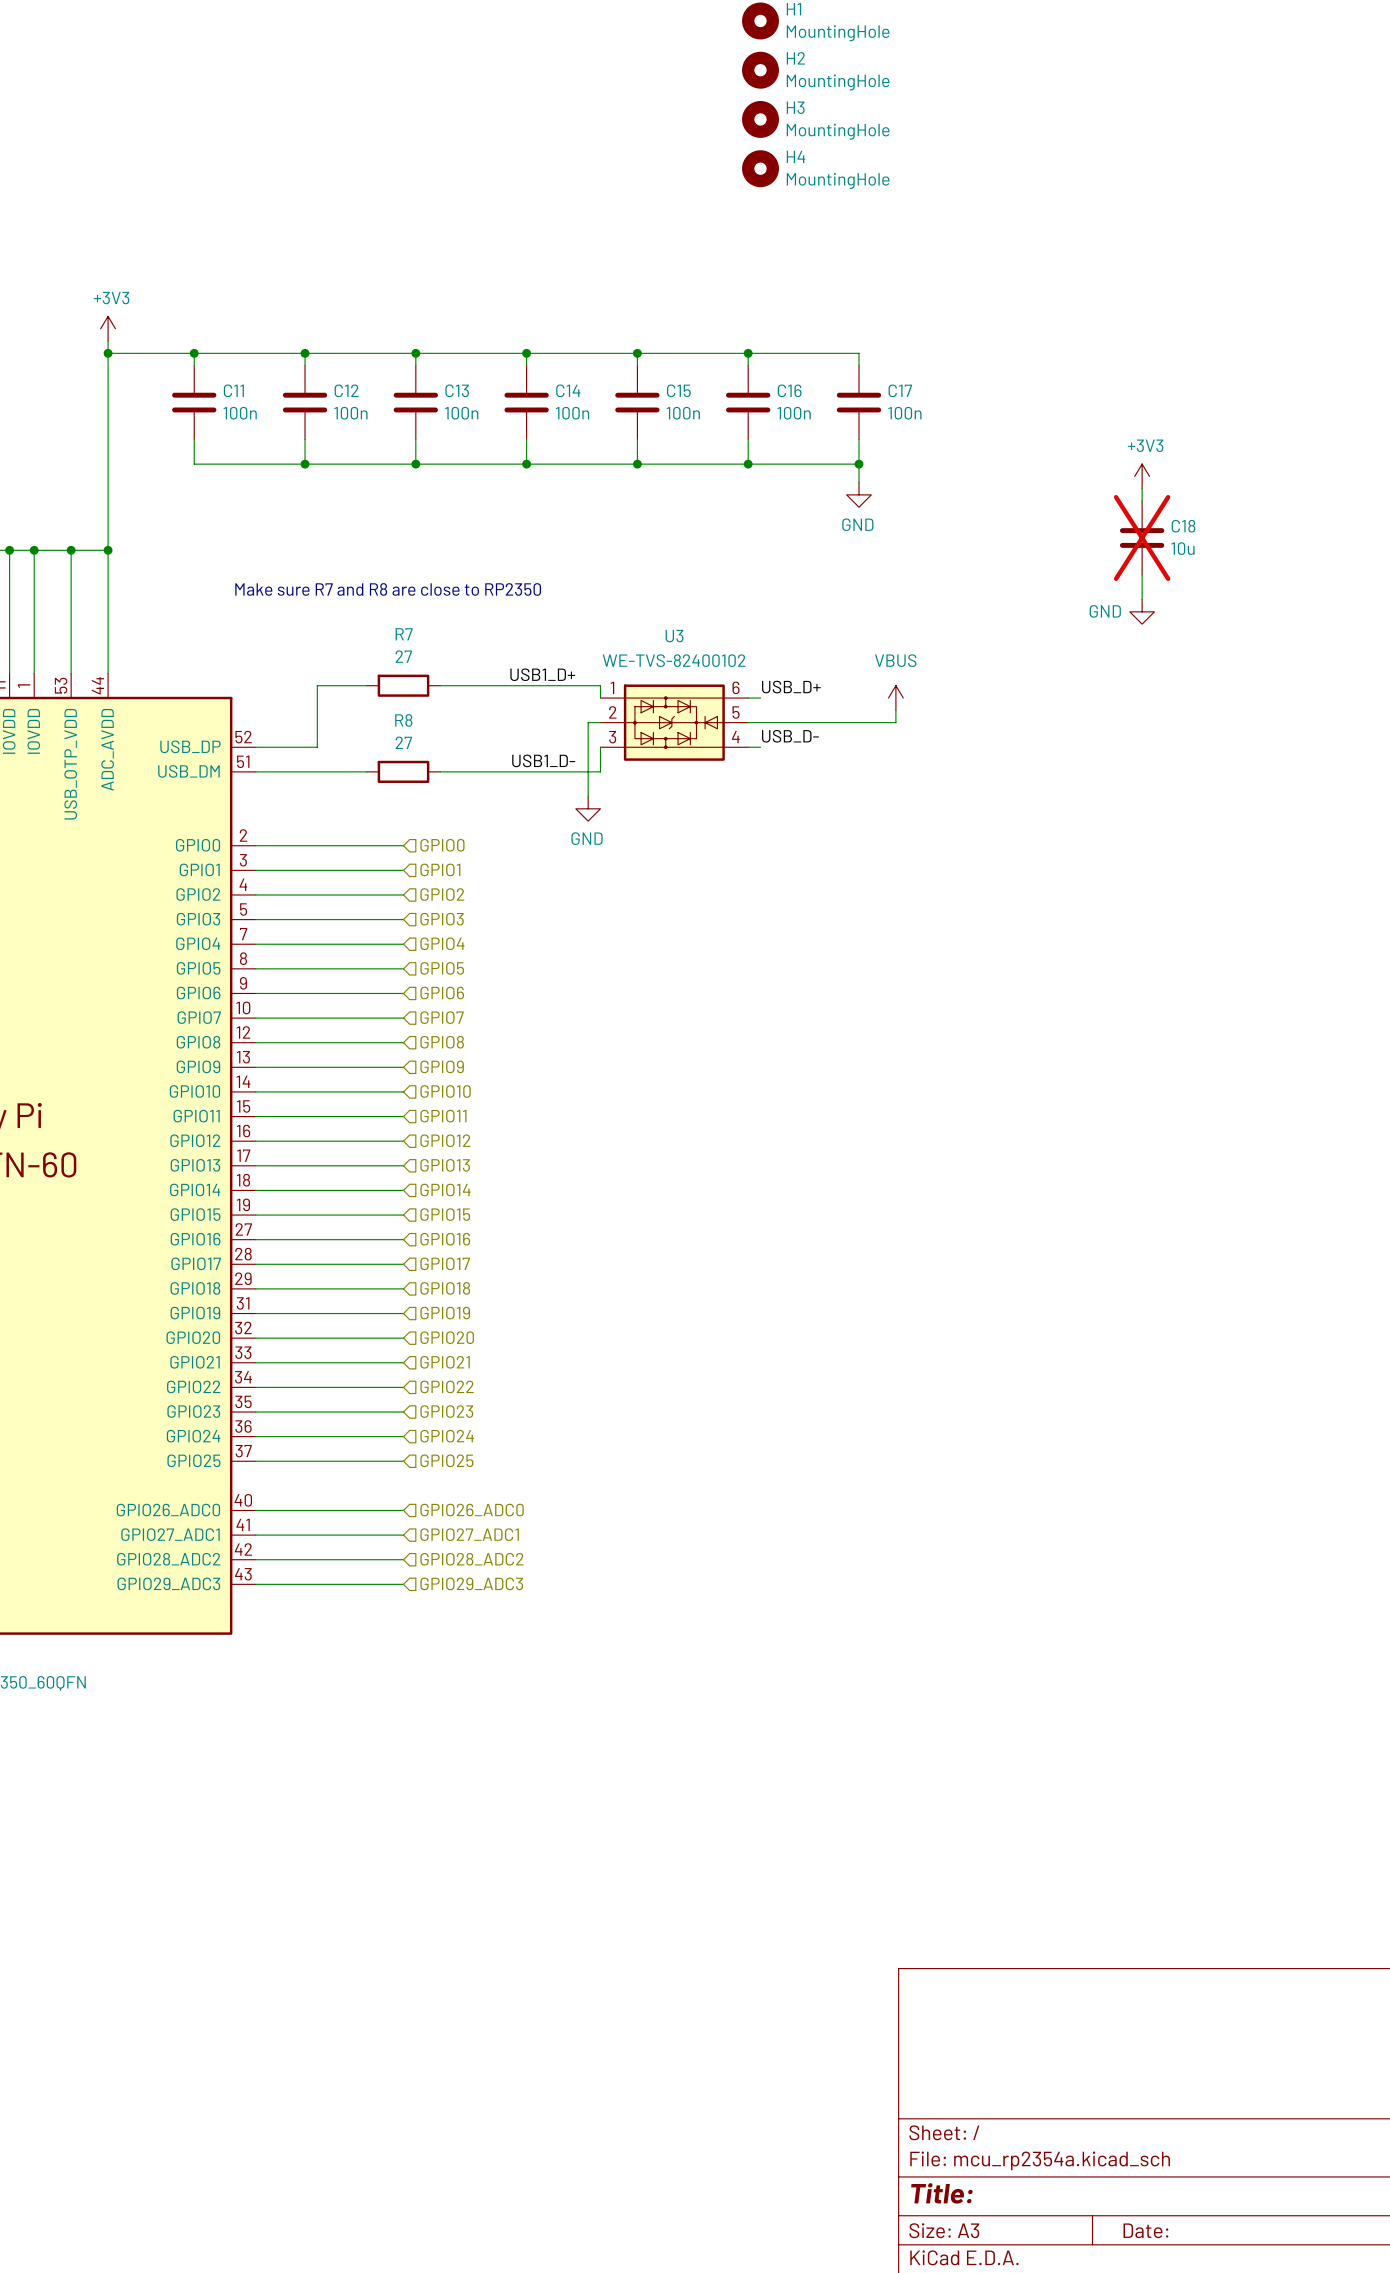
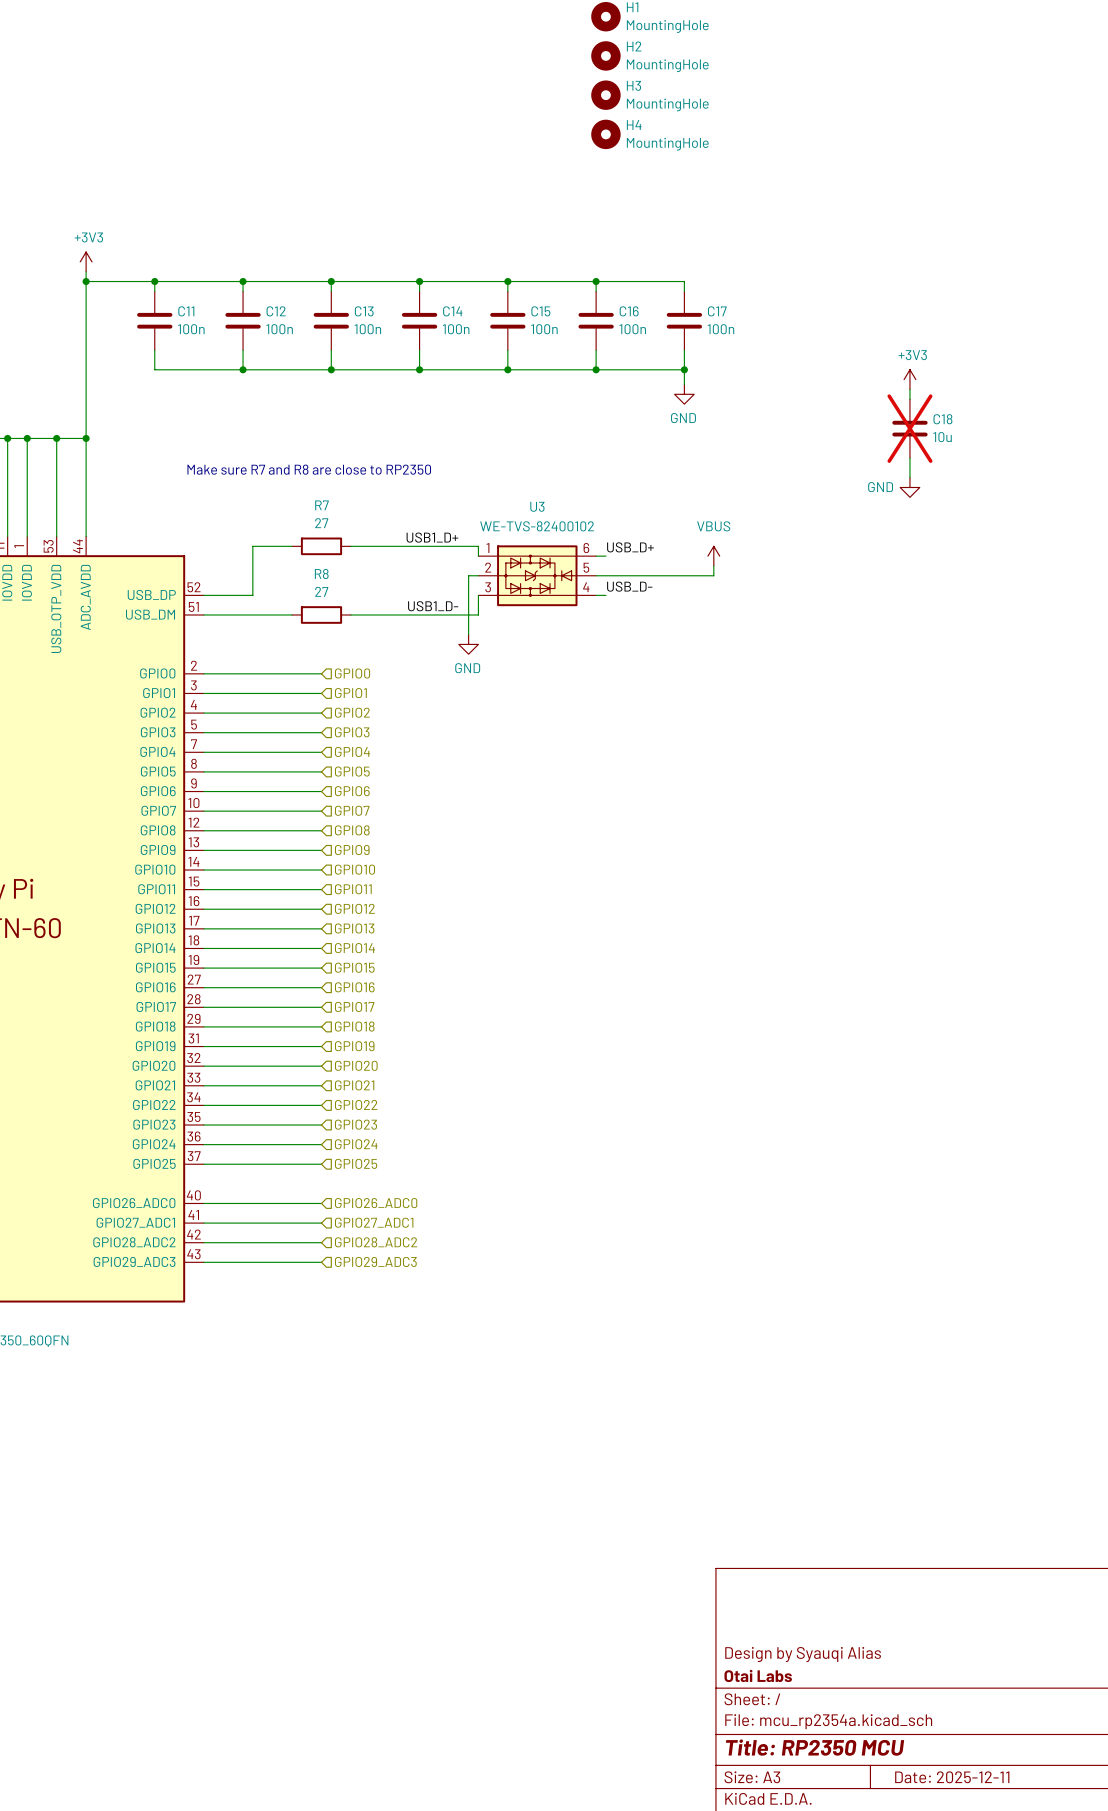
title block: none -> Design by Syauqi Alias (803, 1654)
title block: none -> Otai Labs (758, 1675)
title block: Title: (941, 2193) -> Title: RP2350 MCU (815, 1747)
title block: Date: (1145, 2230) -> Date: 2025-12-11 (952, 1777)

